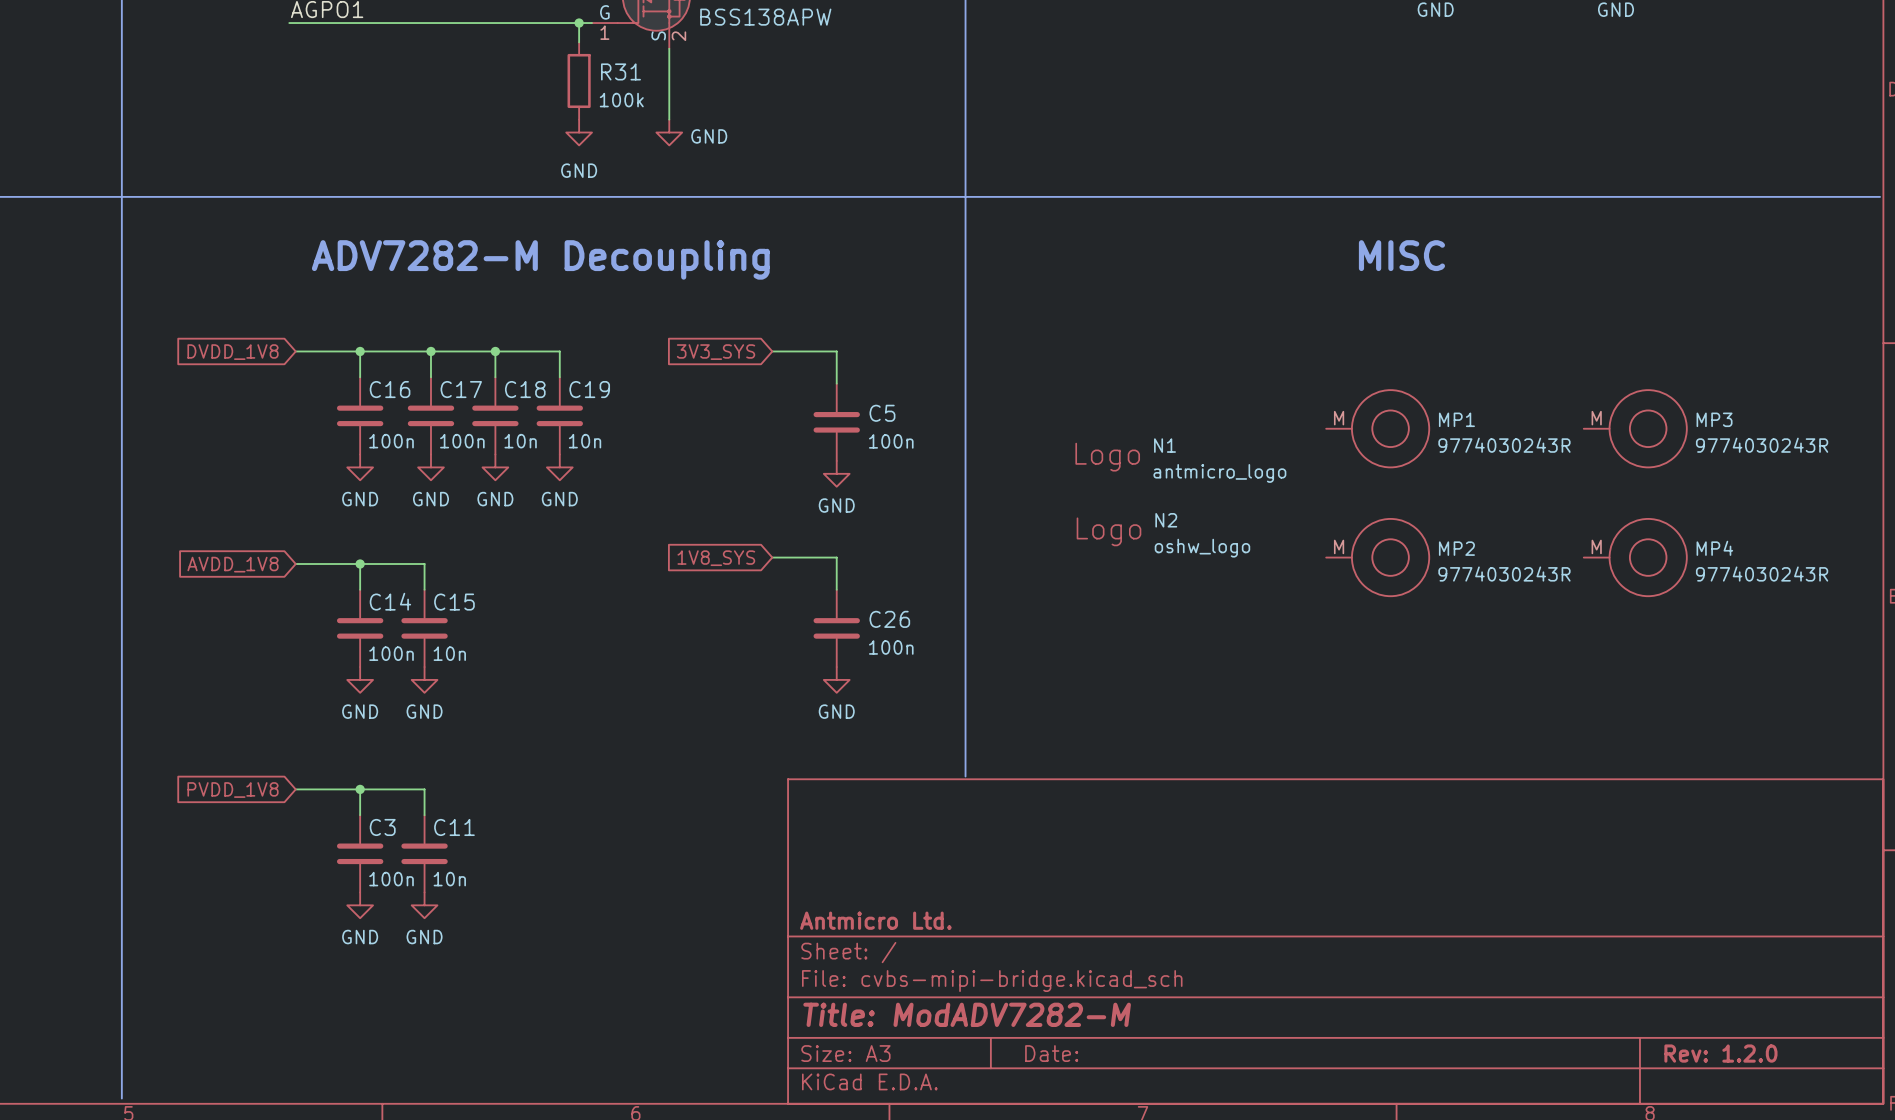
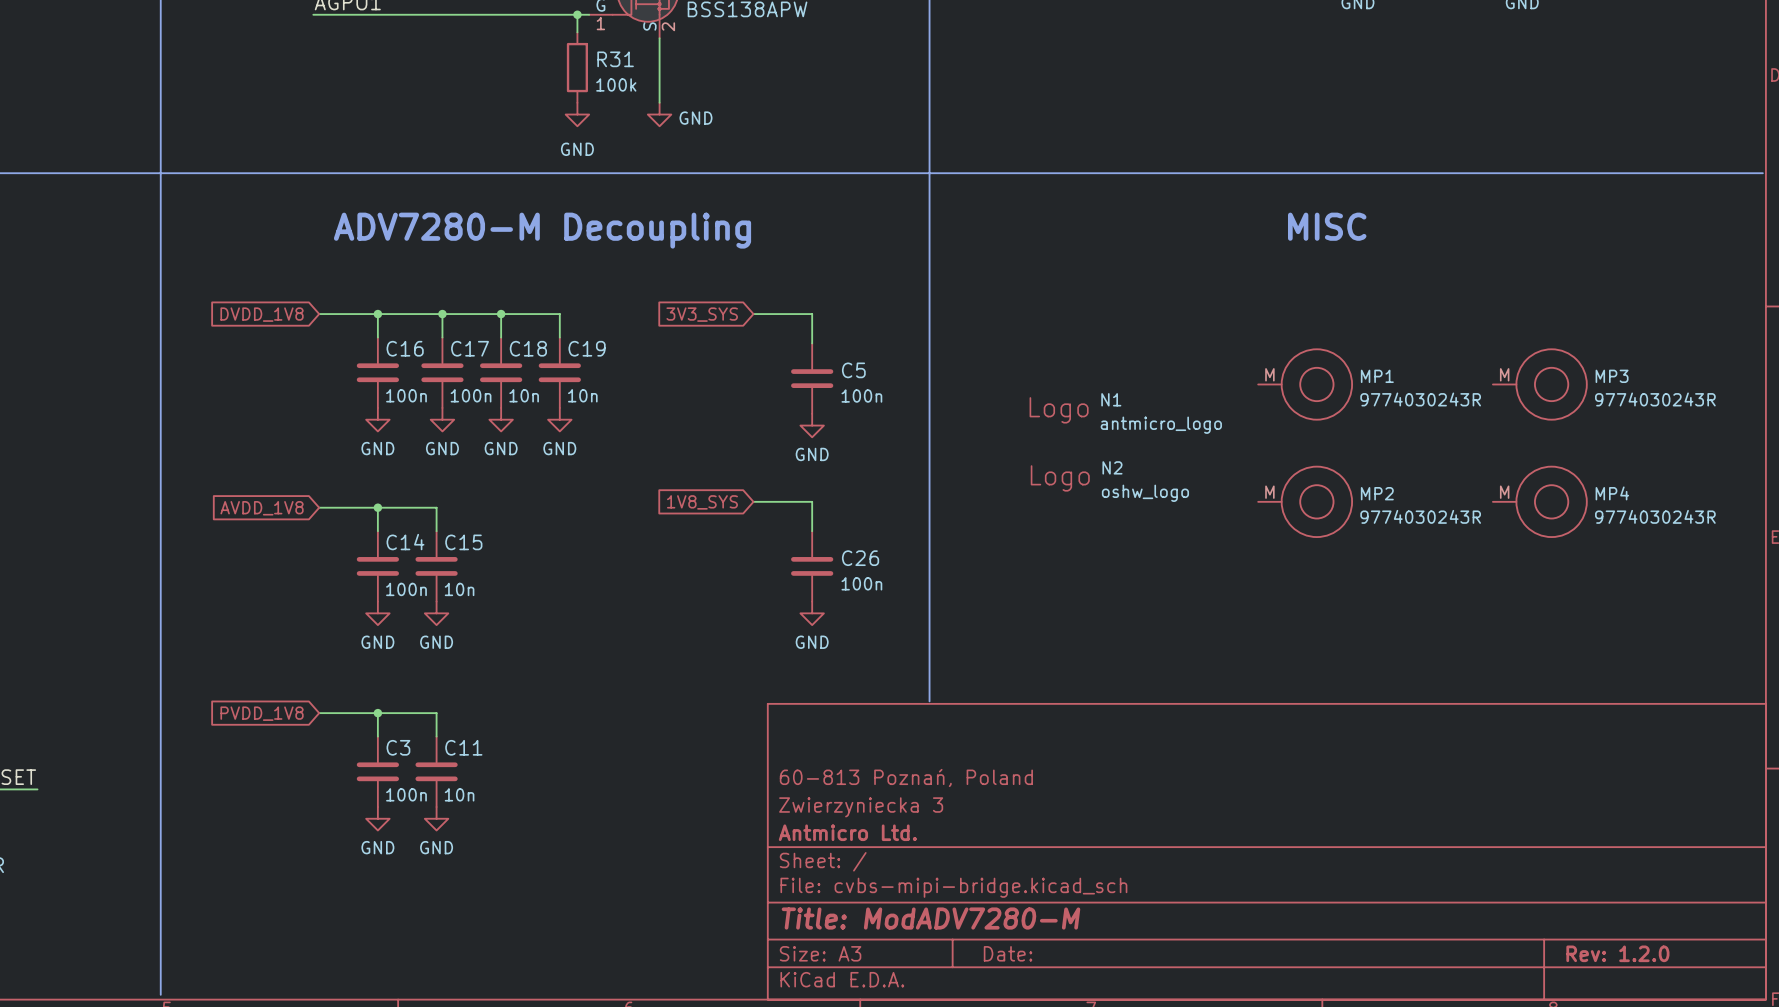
text: ADV7282-M Decoupling (540, 259) -> ADV7280-M Decoupling (542, 230)
title block: none -> 60-813 Poznań, Poland (906, 777)
title block: none -> Zwierzyniecka 3 (861, 807)
title block: Title: ModADV7282-M (967, 1014) -> Title: ModADV7280-M (930, 918)

